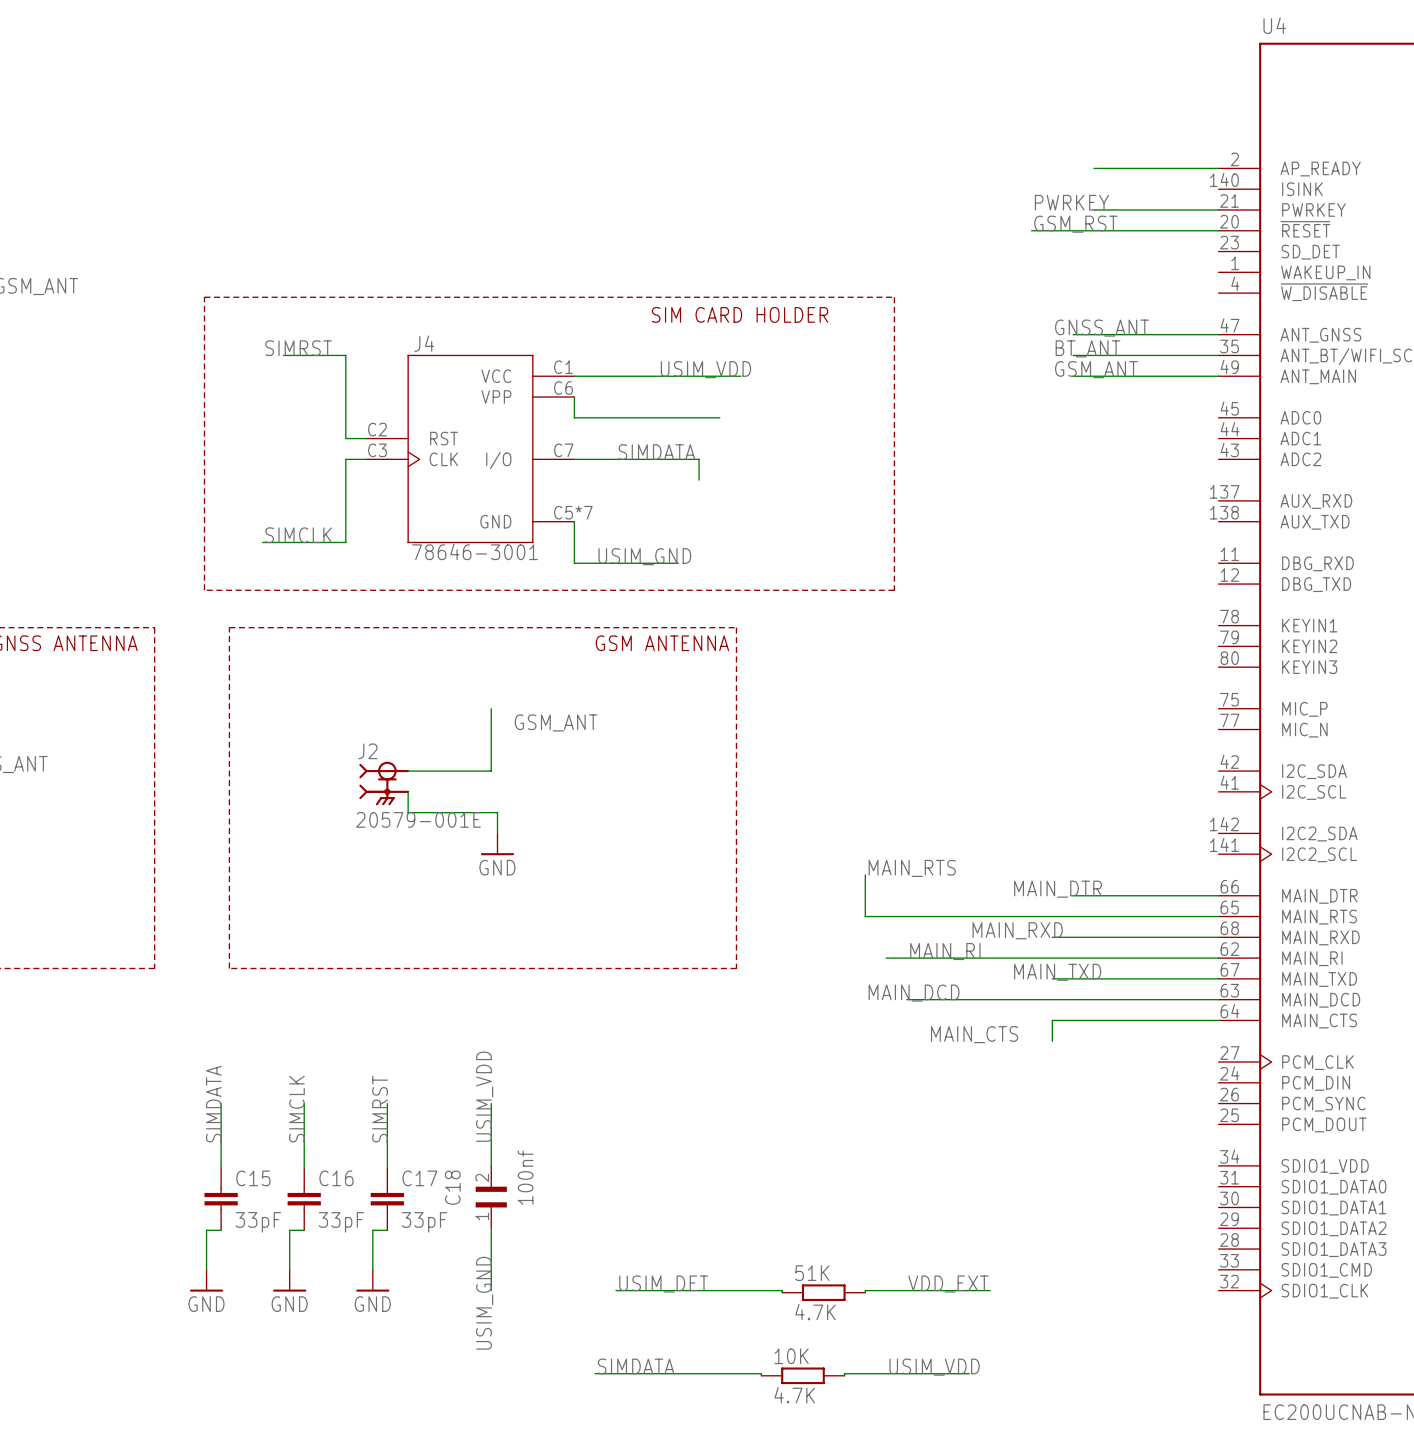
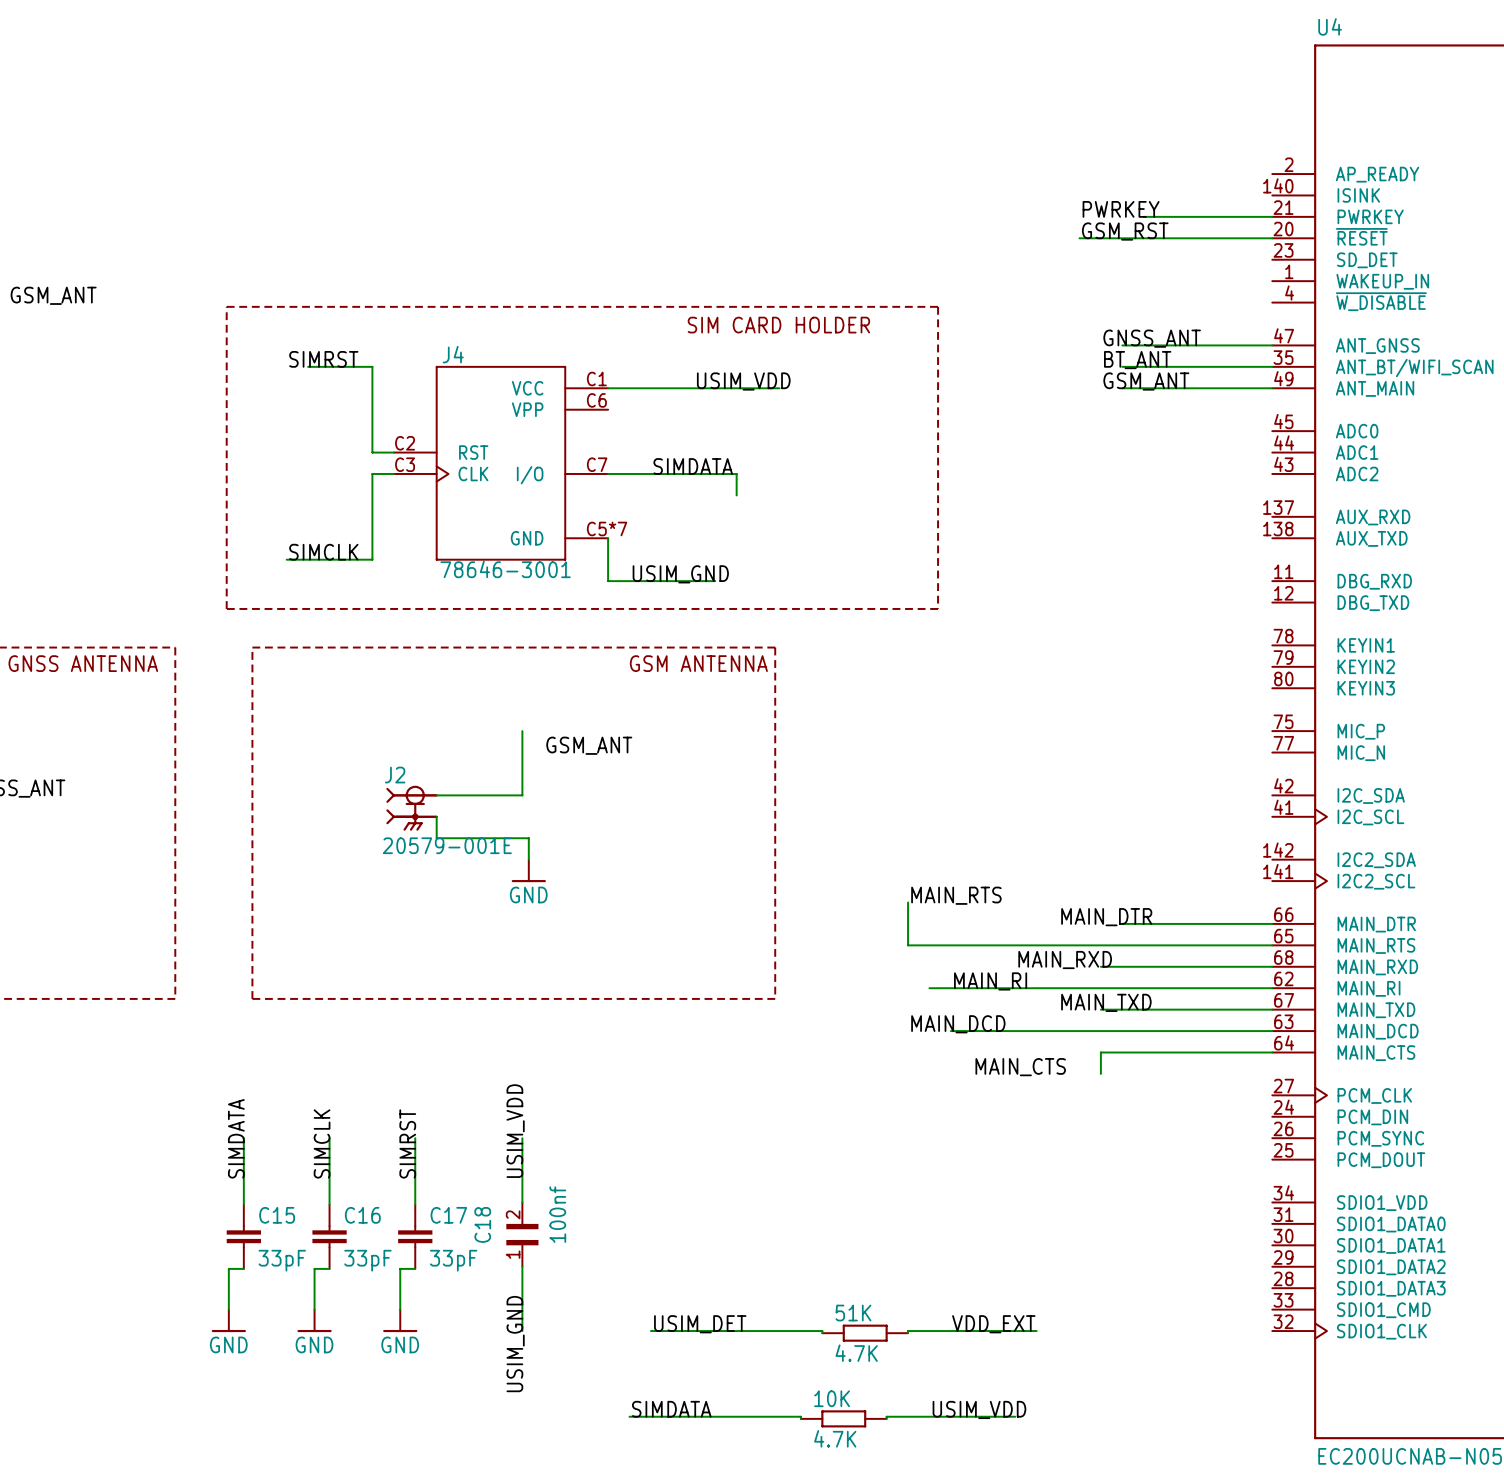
wire: (1093, 168) (1218, 168) -> none
wire: (574, 397) (574, 417) (719, 417) -> none

